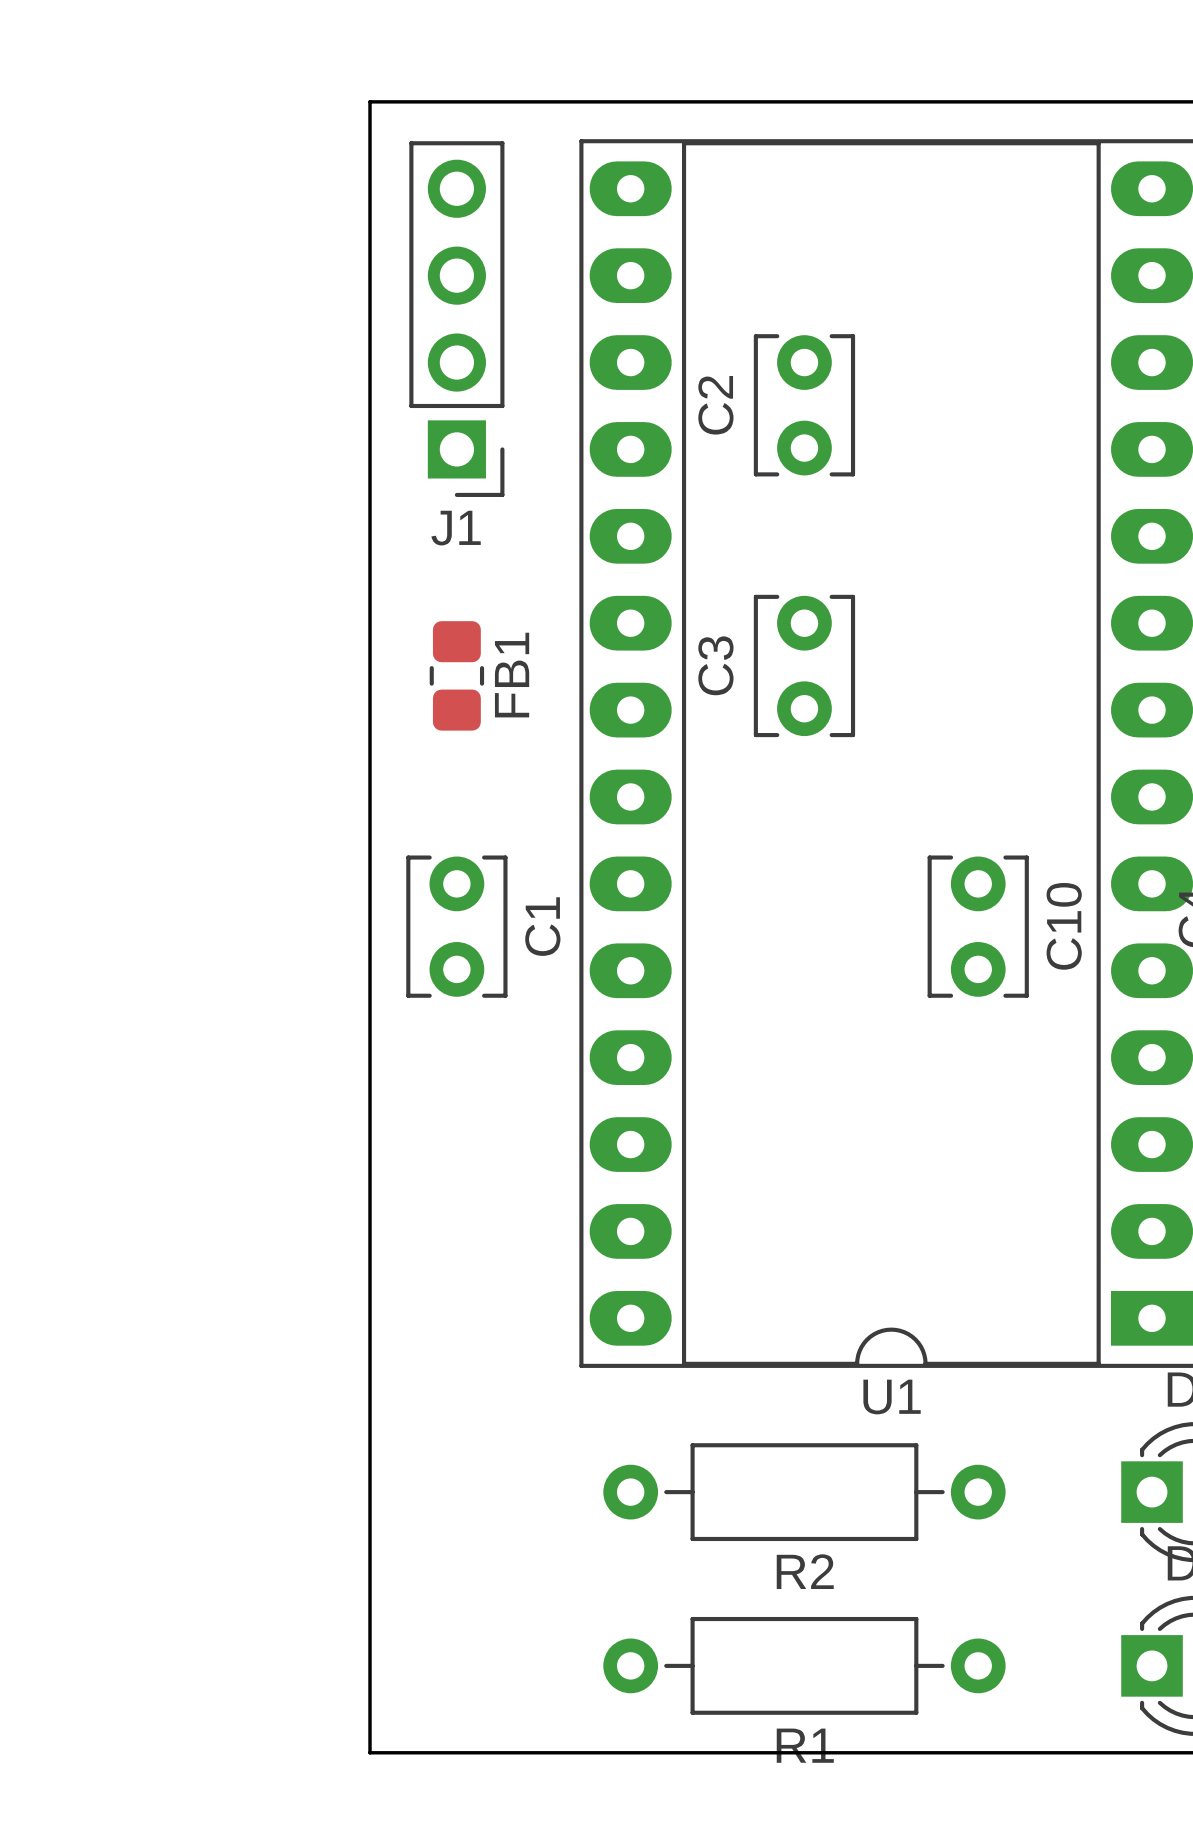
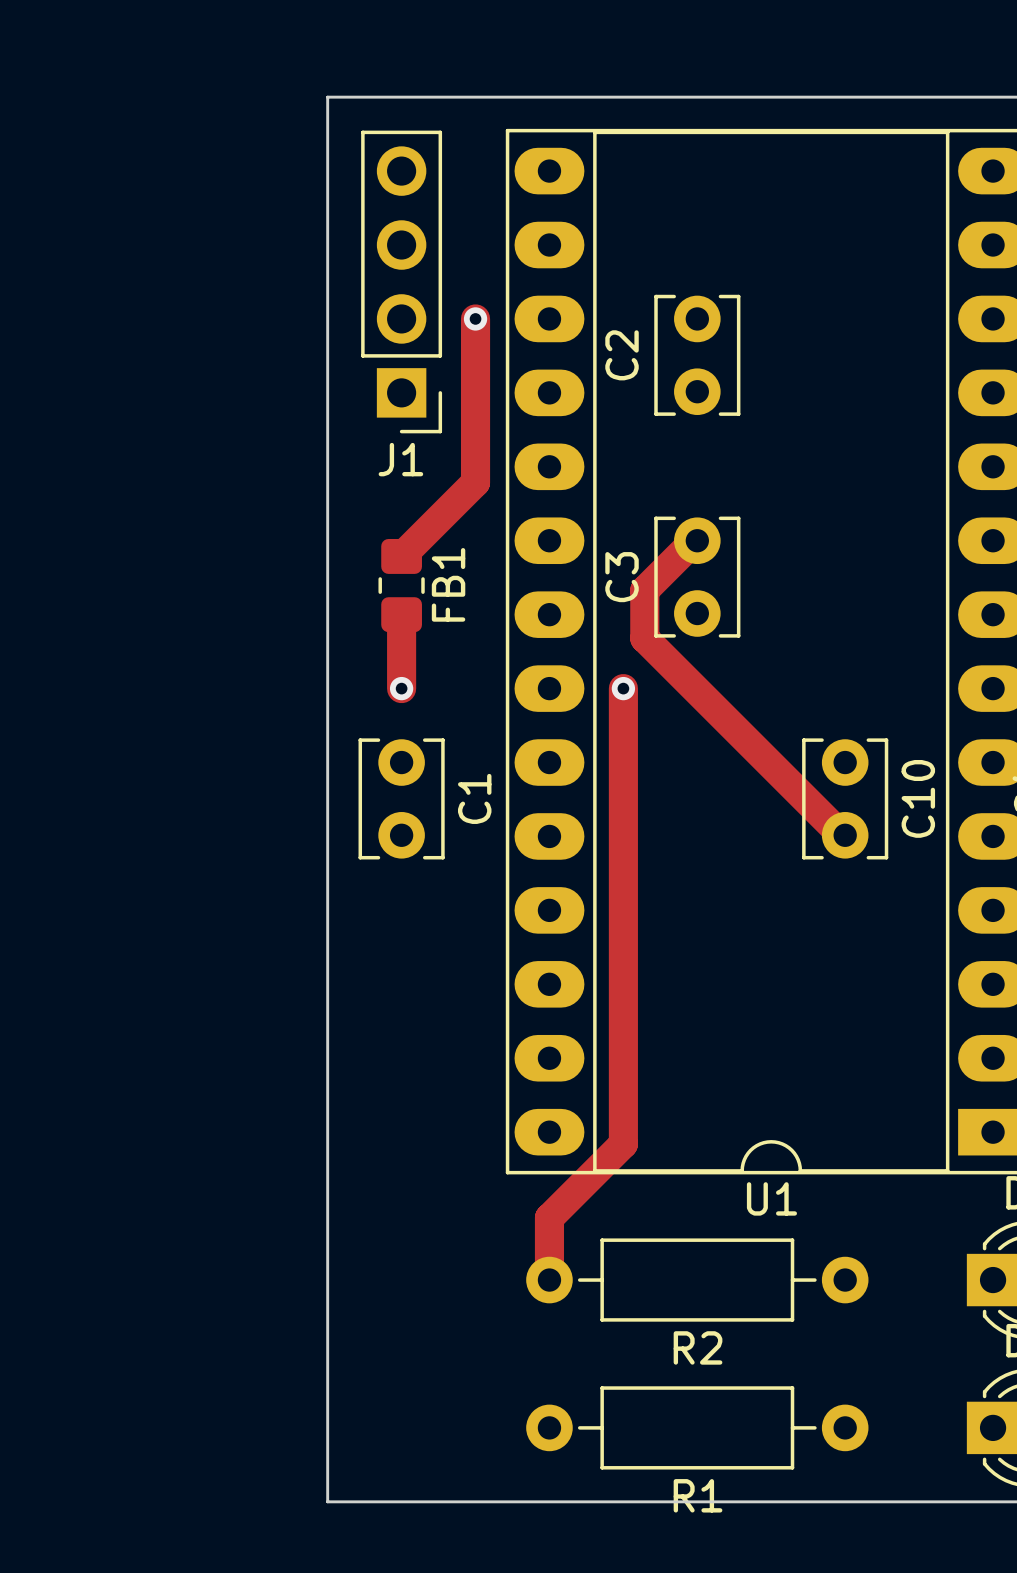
track: none -> (475, 318) (475, 482) (401, 556)
via: none -> (475, 318)
track: none -> (694, 540) (644, 590) (644, 638) (841, 835)
track: none -> (401, 614) (401, 688)
via: none -> (401, 688)
track: none -> (623, 688) (623, 1143) (549, 1217) (549, 1280)
via: none -> (623, 688)

